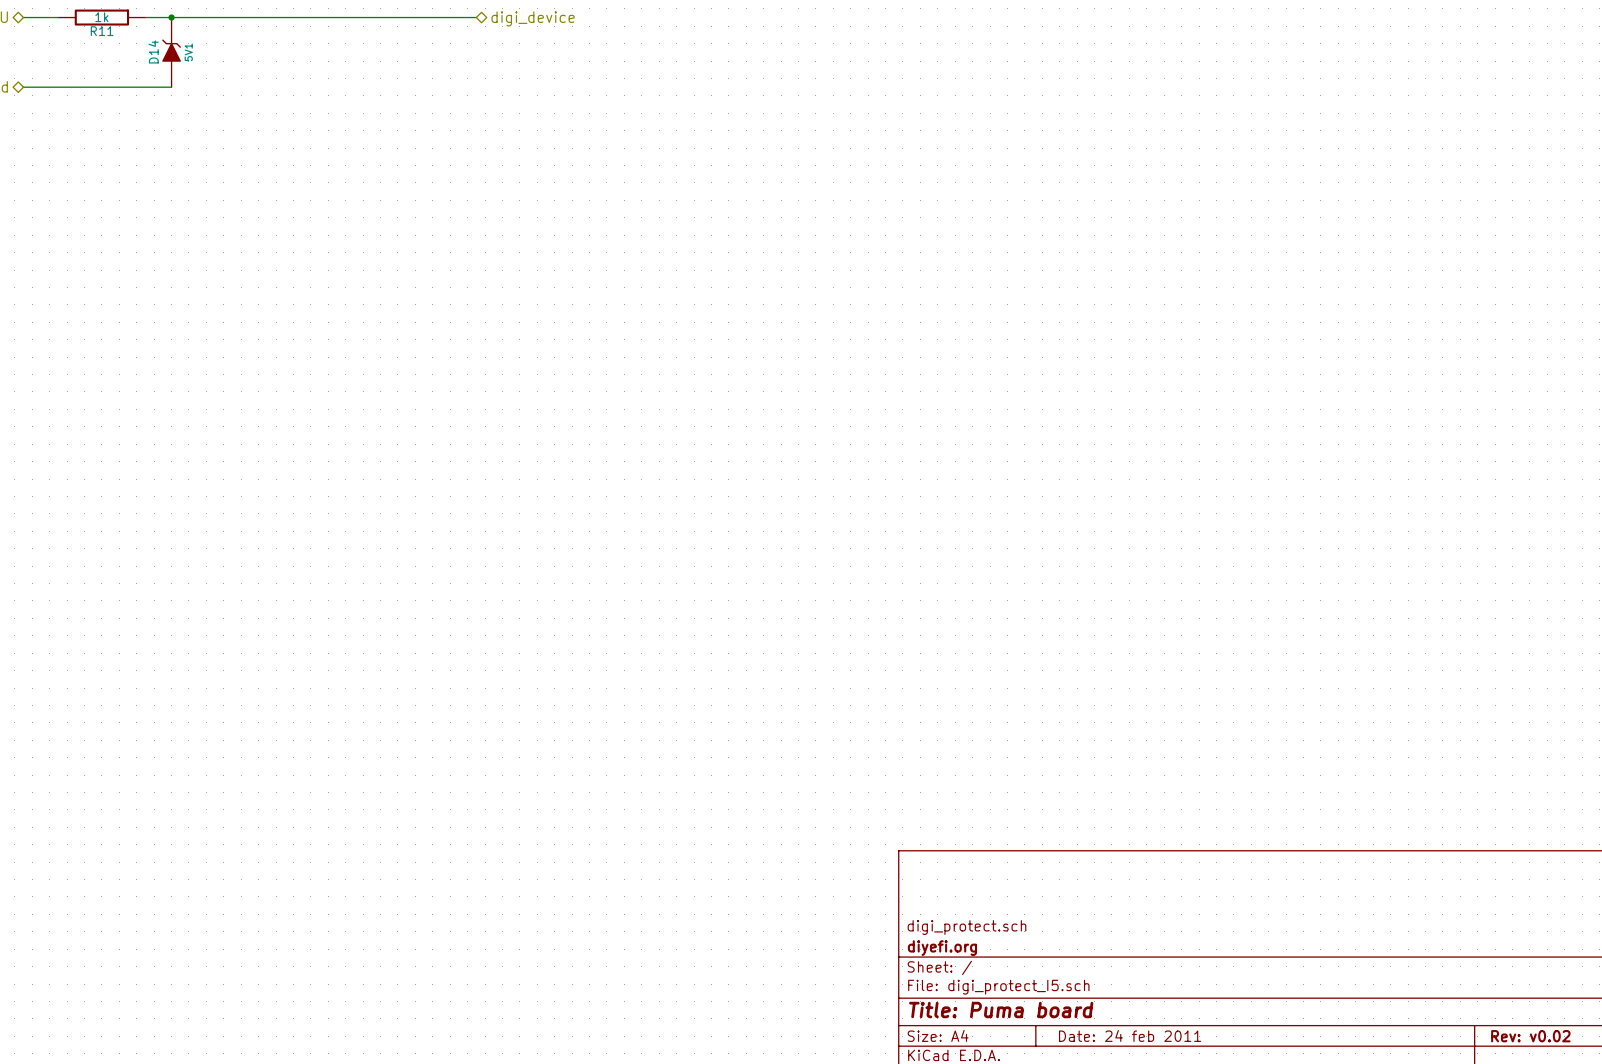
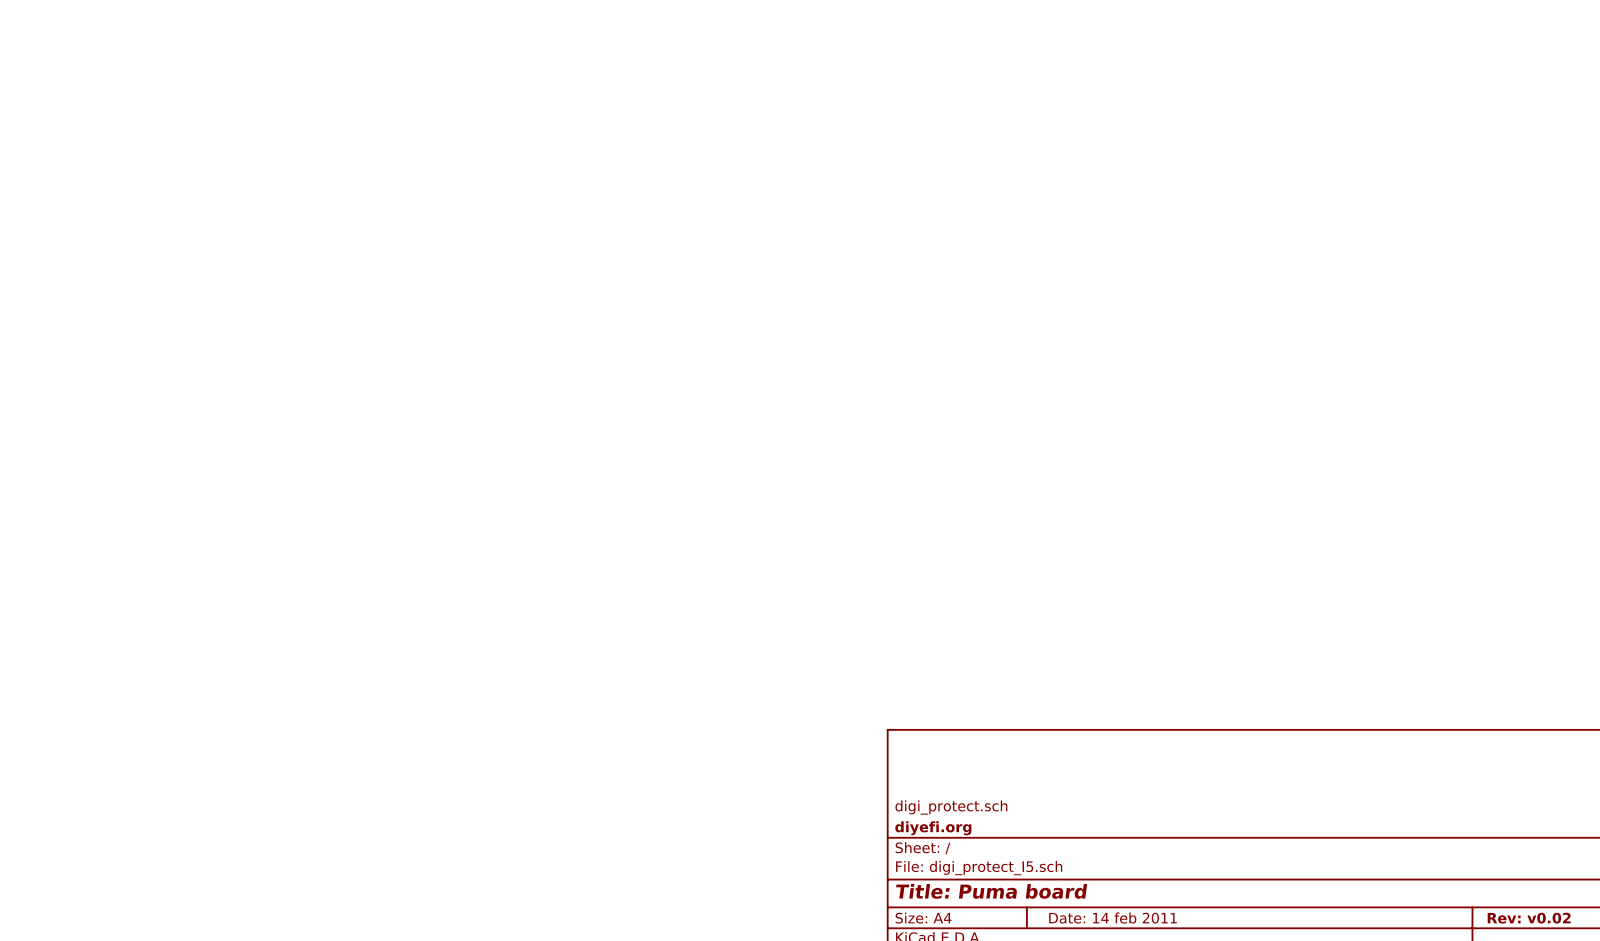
title block: Date: 24 feb 2011 (1130, 1035) -> Date: 14 feb 2011 (1113, 918)

